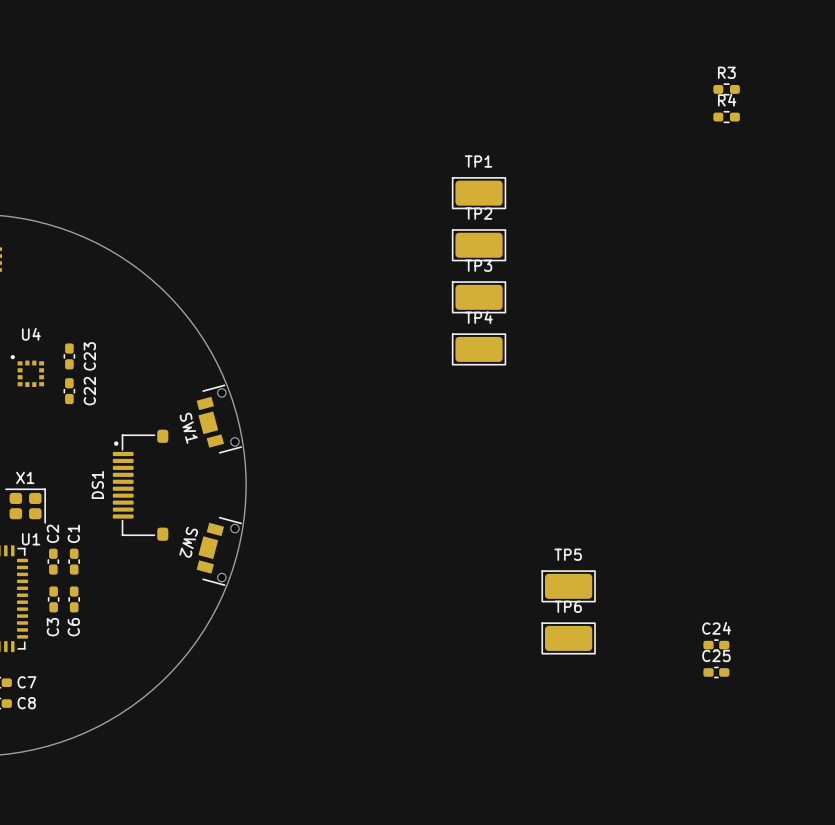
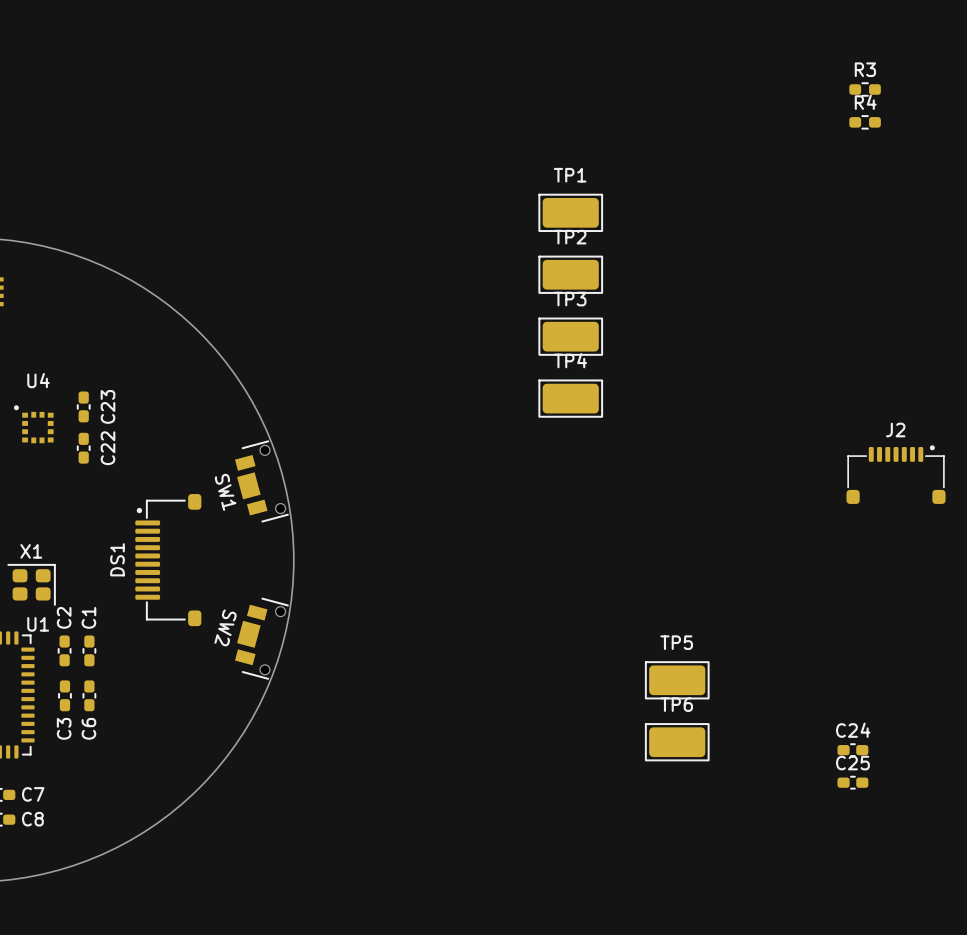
J2: none -> (896, 474)

